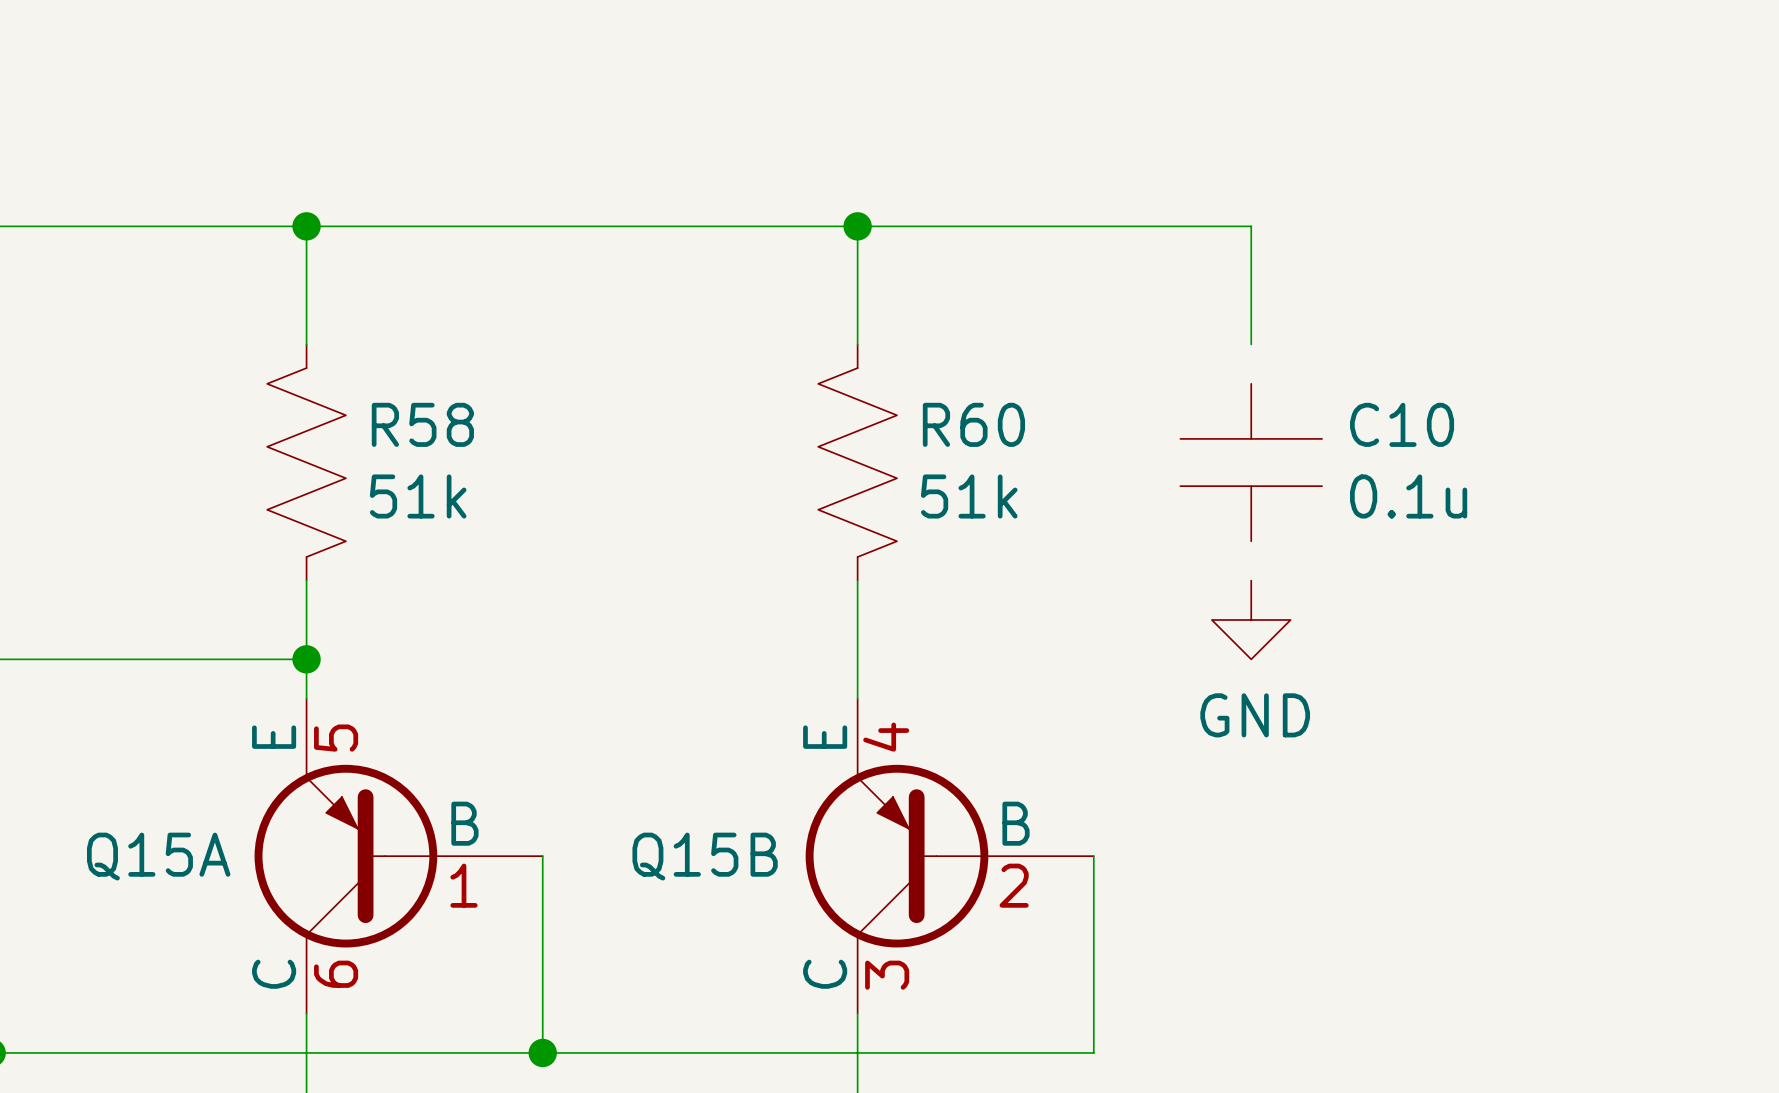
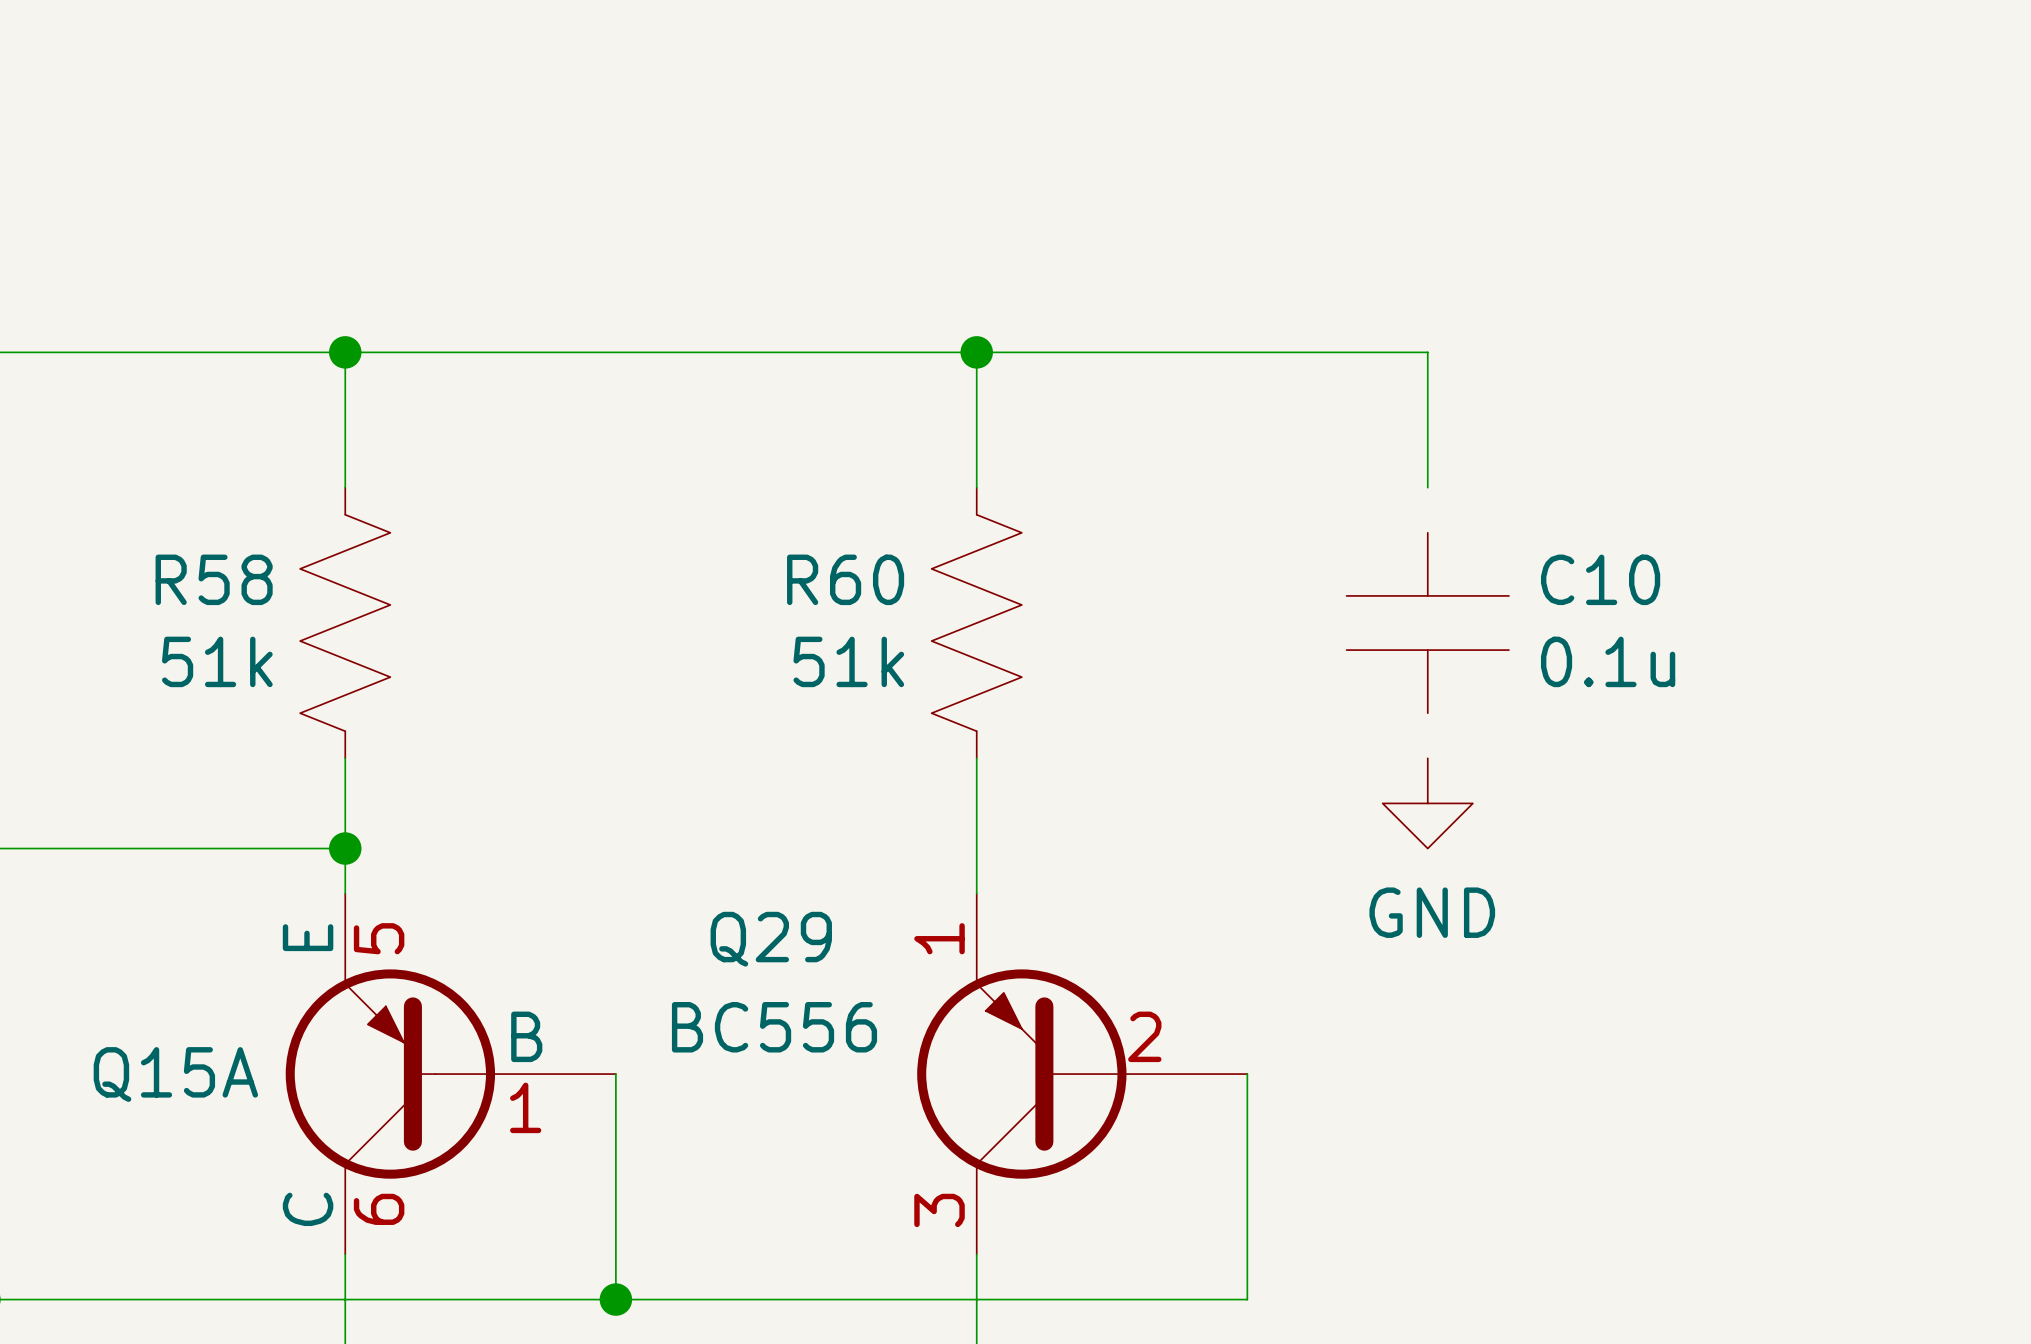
R58 flip: as is (306, 462) -> left-right (345, 623)
R60 flip: as is (857, 462) -> left-right (976, 623)
Q15B: (949, 856) -> none
Q29: none -> BC556 (1082, 1074)

